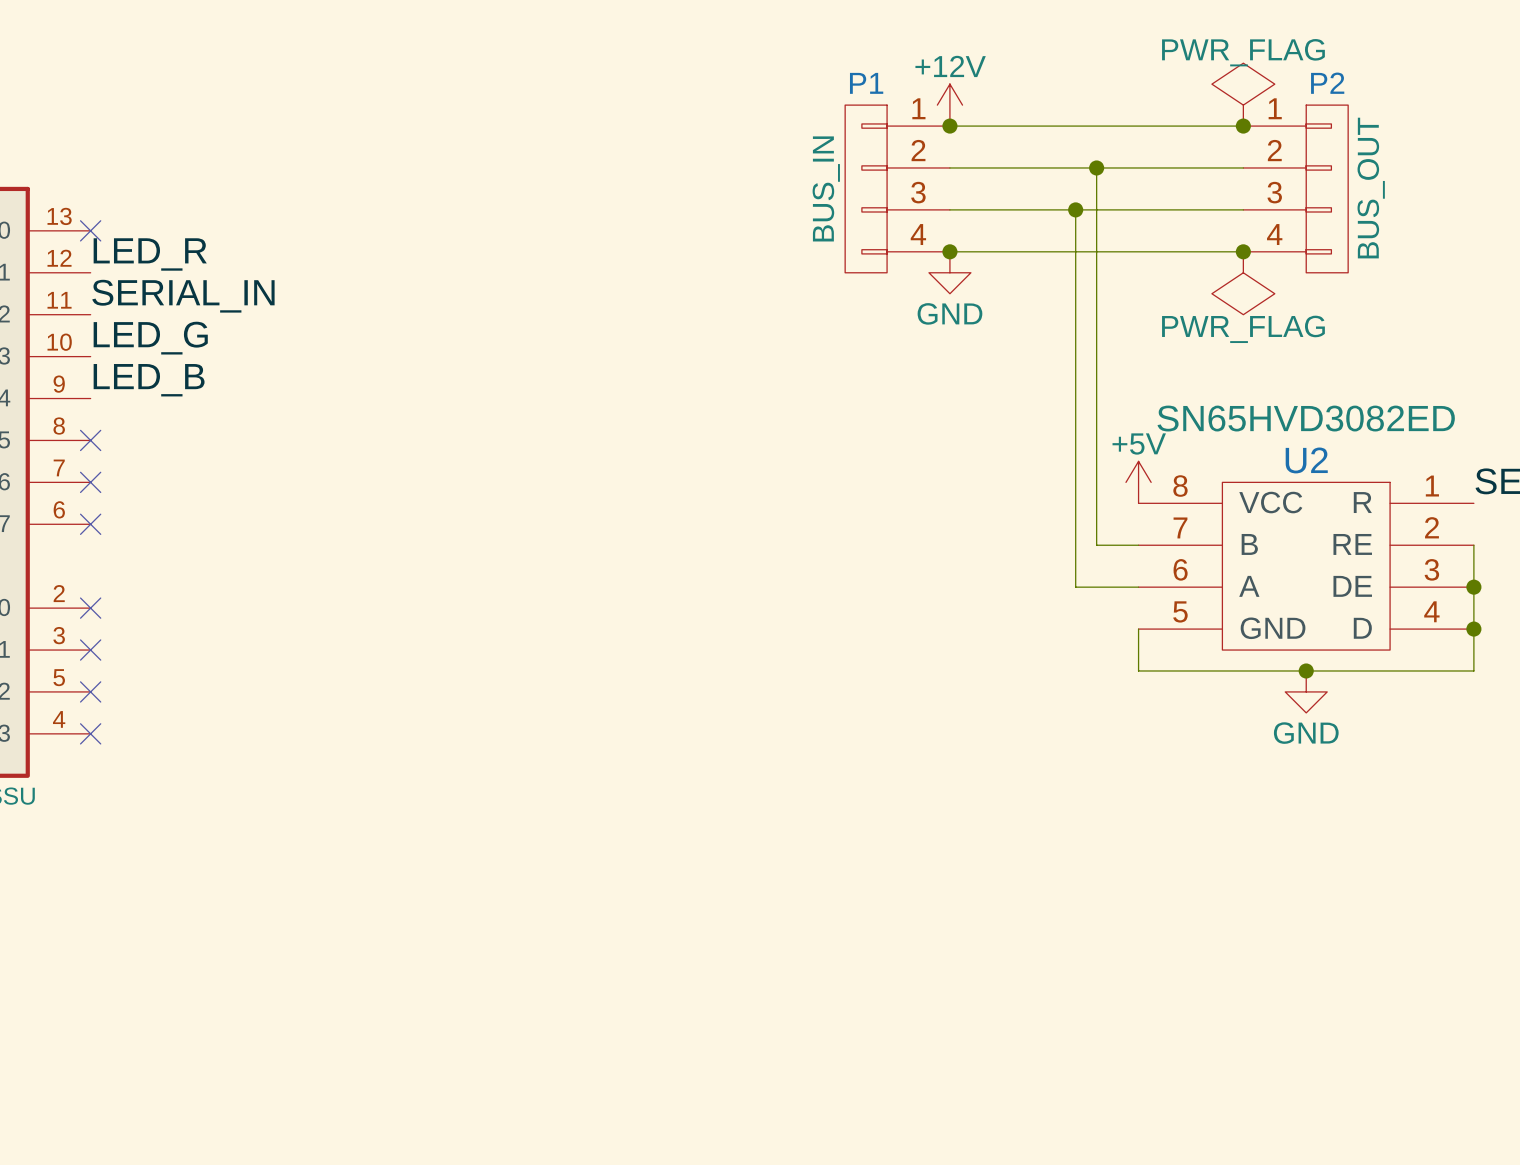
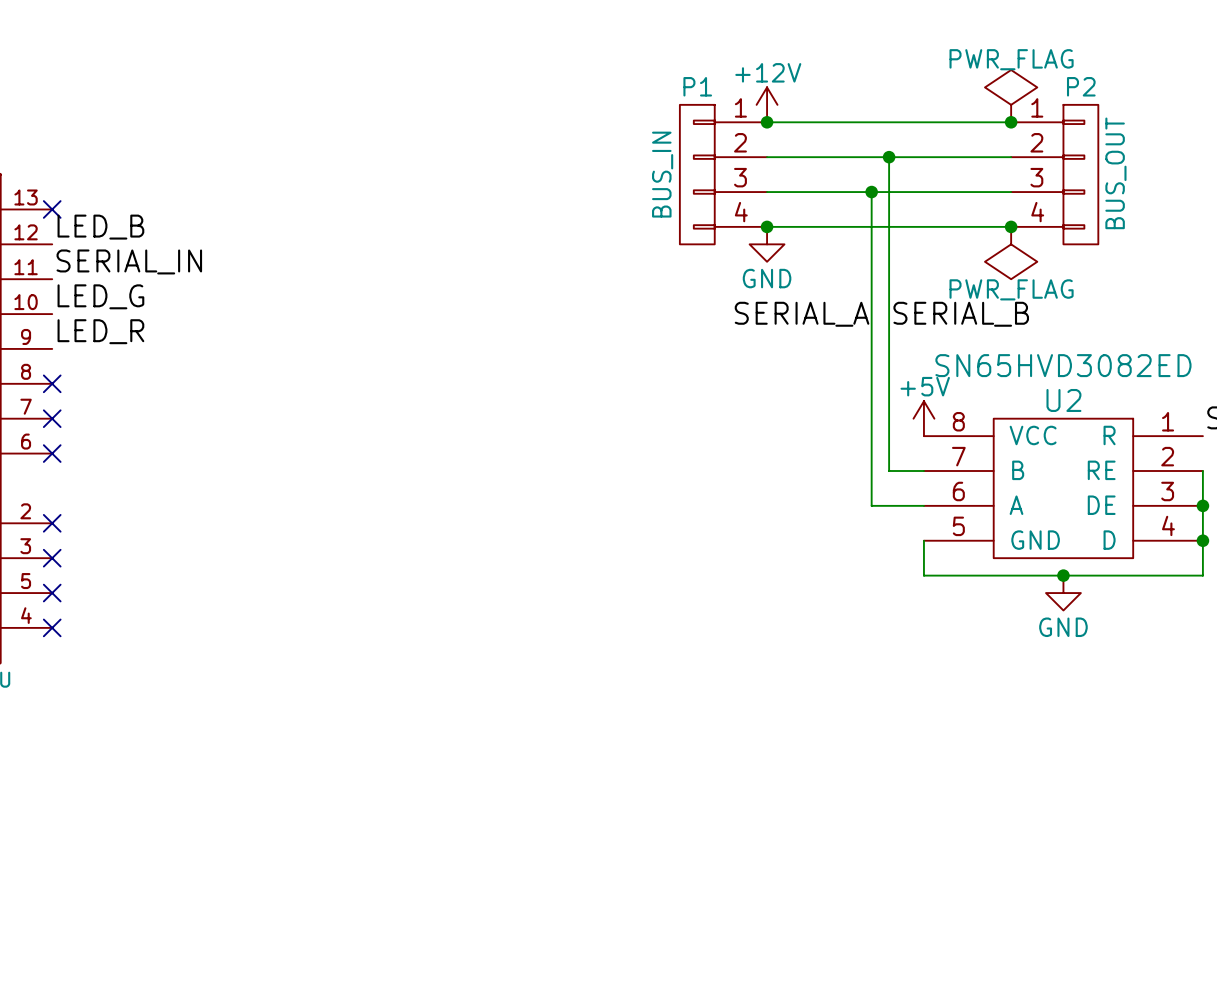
label: LED_R (150, 254) -> LED_B (100, 227)
label: none -> SERIAL_A (802, 314)
label: none -> SERIAL_B (961, 314)
label: LED_B (149, 380) -> LED_R (100, 331)

